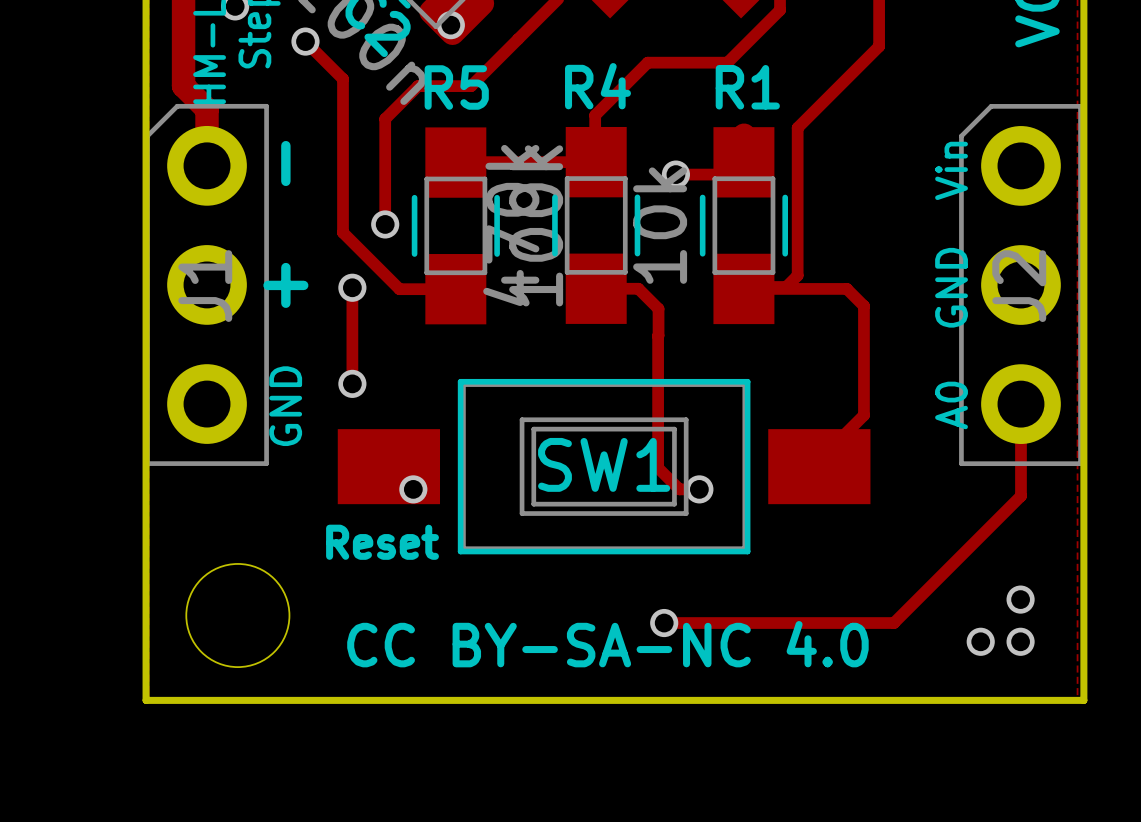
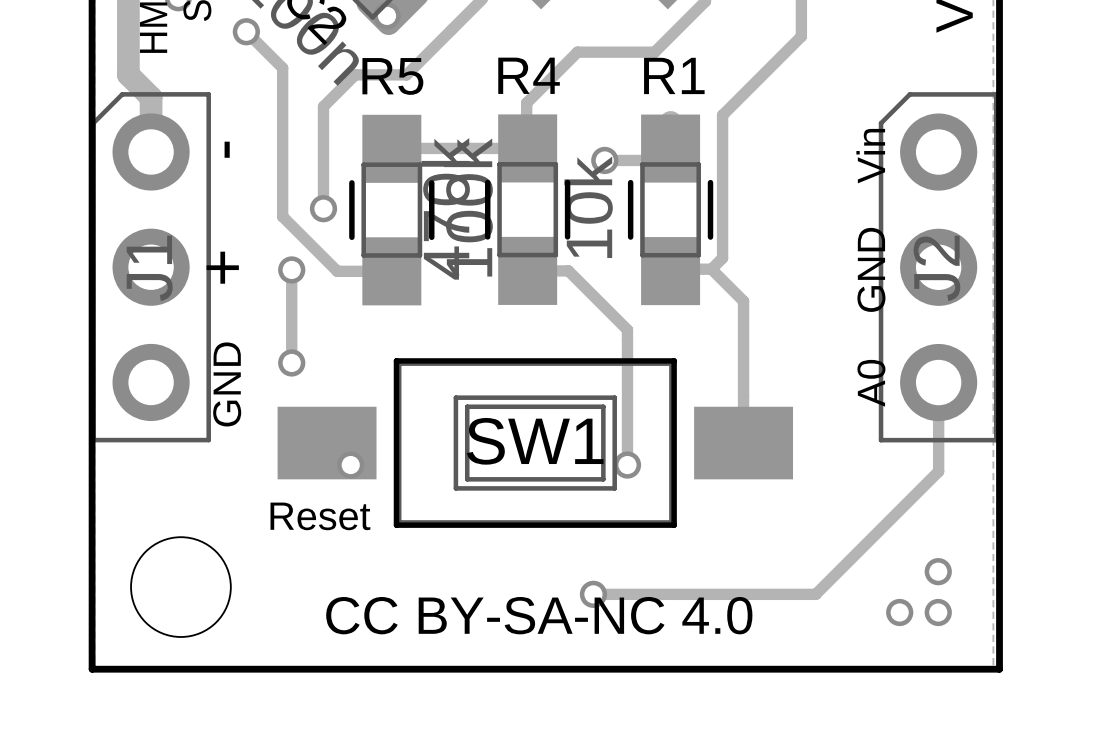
track: (743, 288) (846, 288) (863, 306) (863, 415) (819, 459) -> (711, 269) (743, 301) (743, 436)
track: (658, 308) (658, 335) -> none
track: (658, 336) (658, 468) (679, 489) (699, 489) -> (587, 290) (627, 329) (627, 465)

